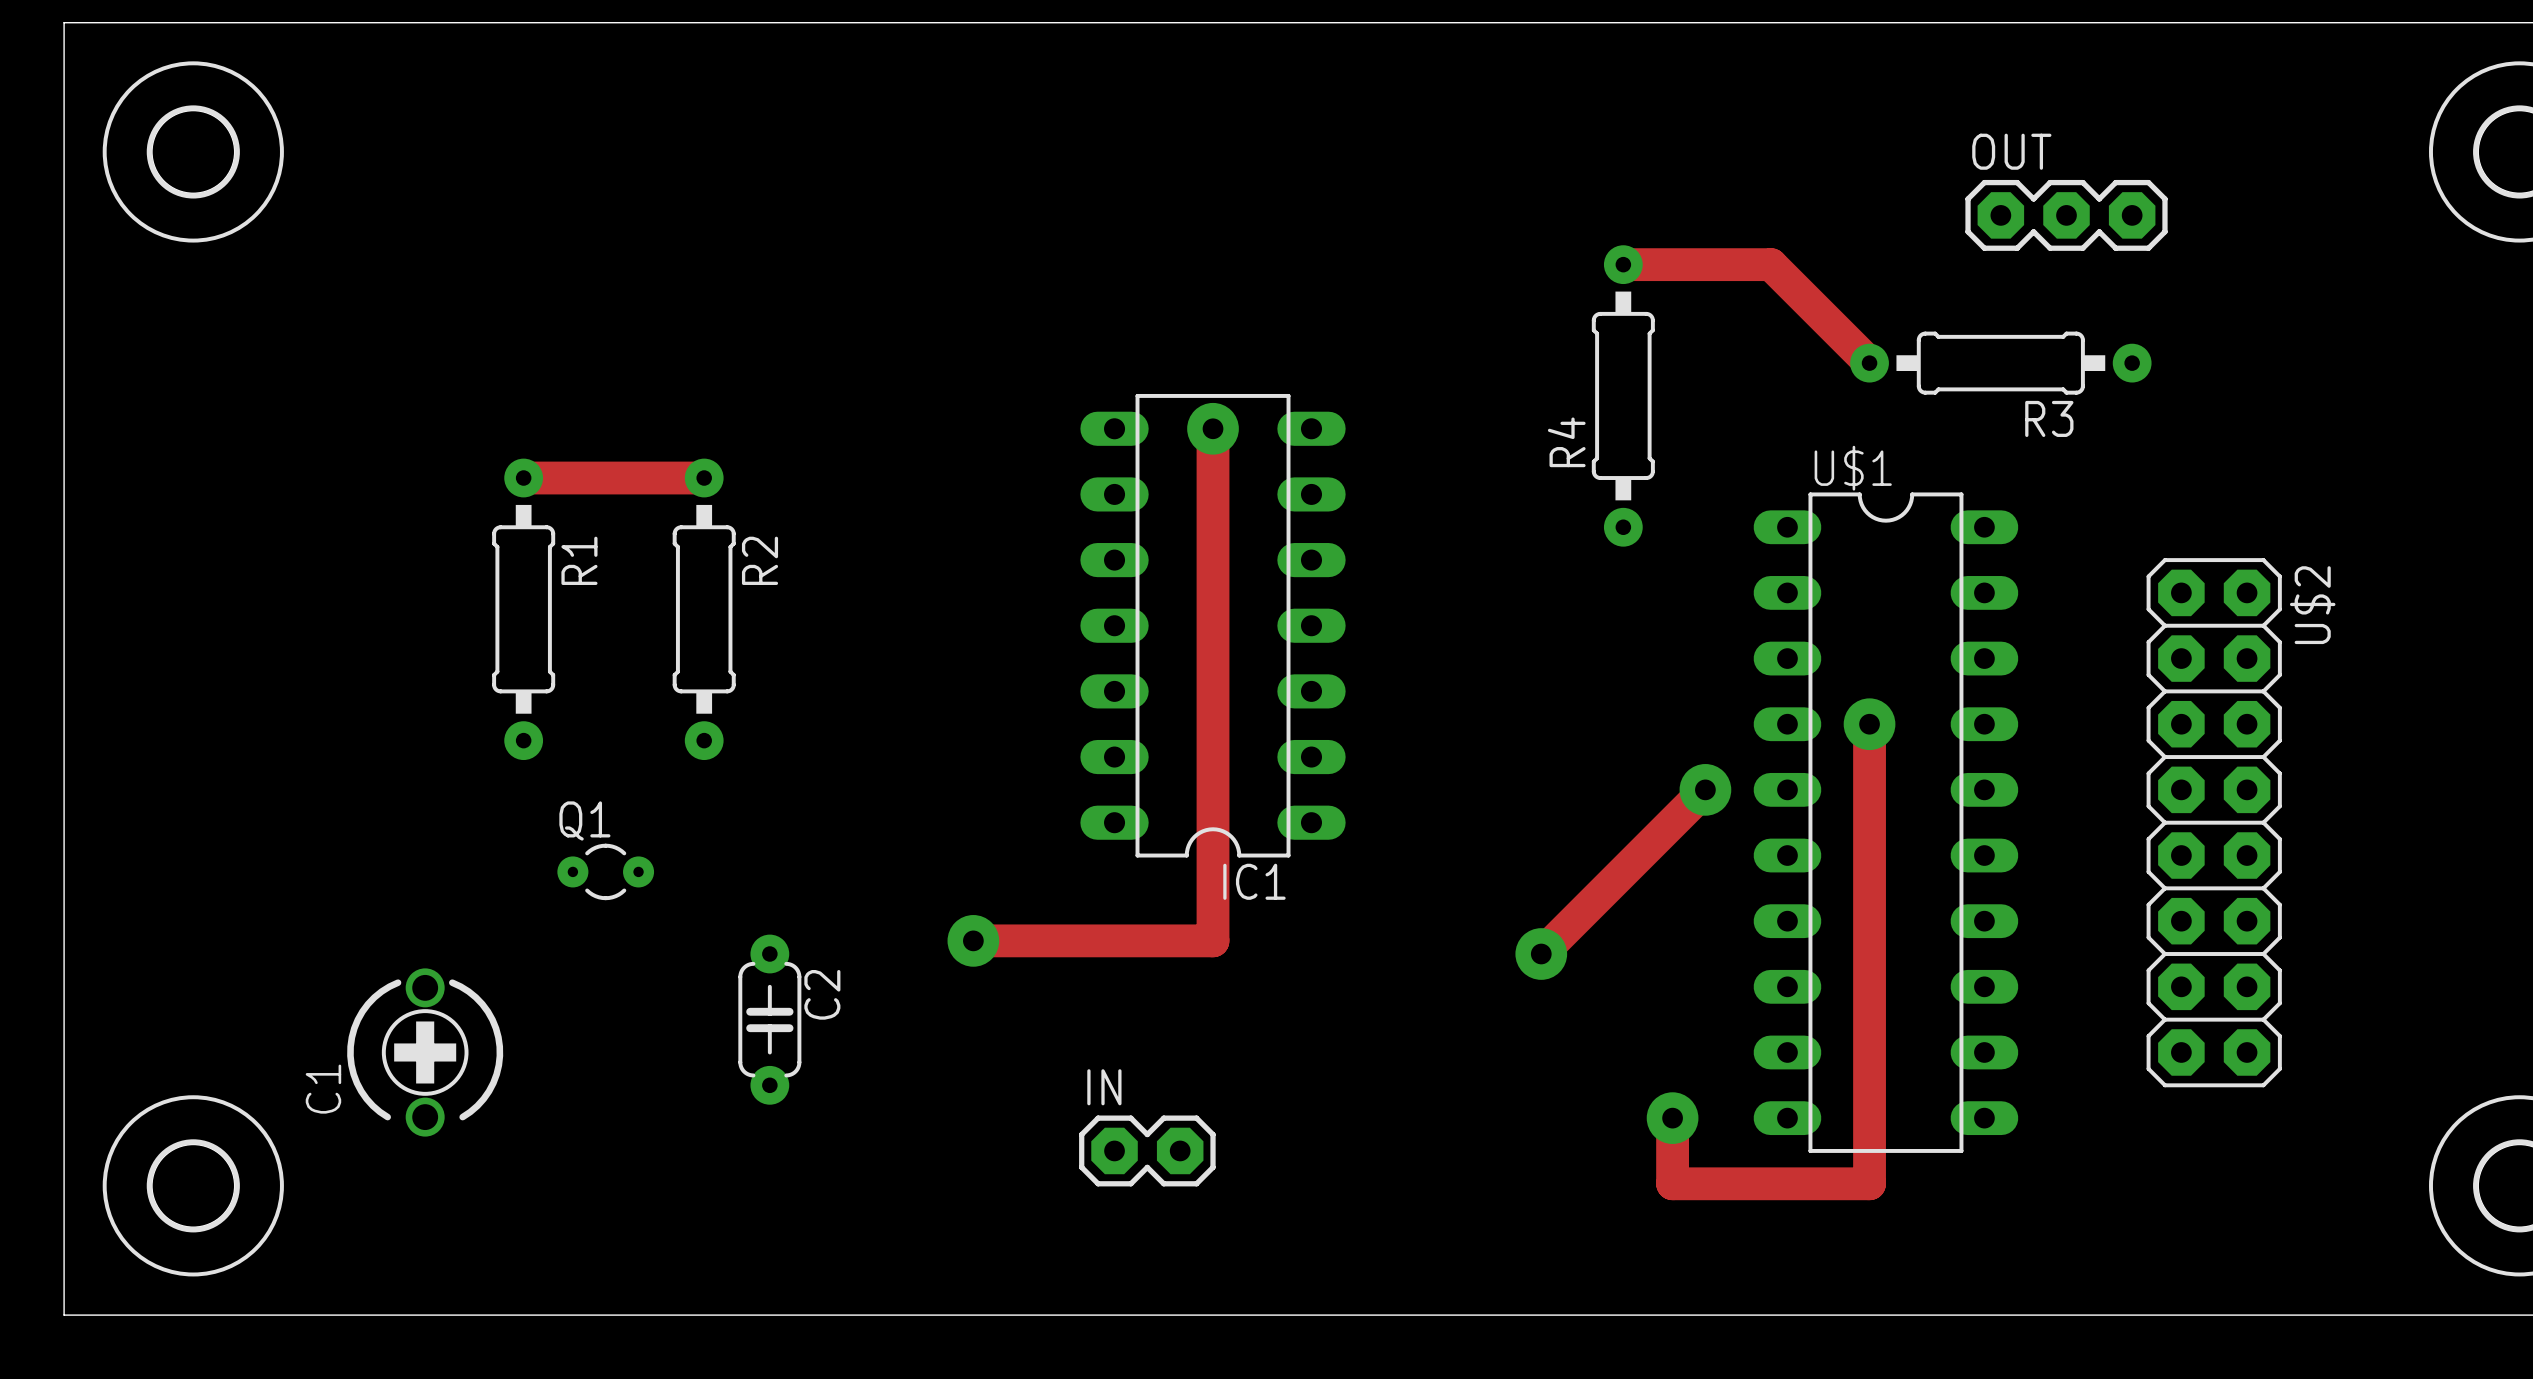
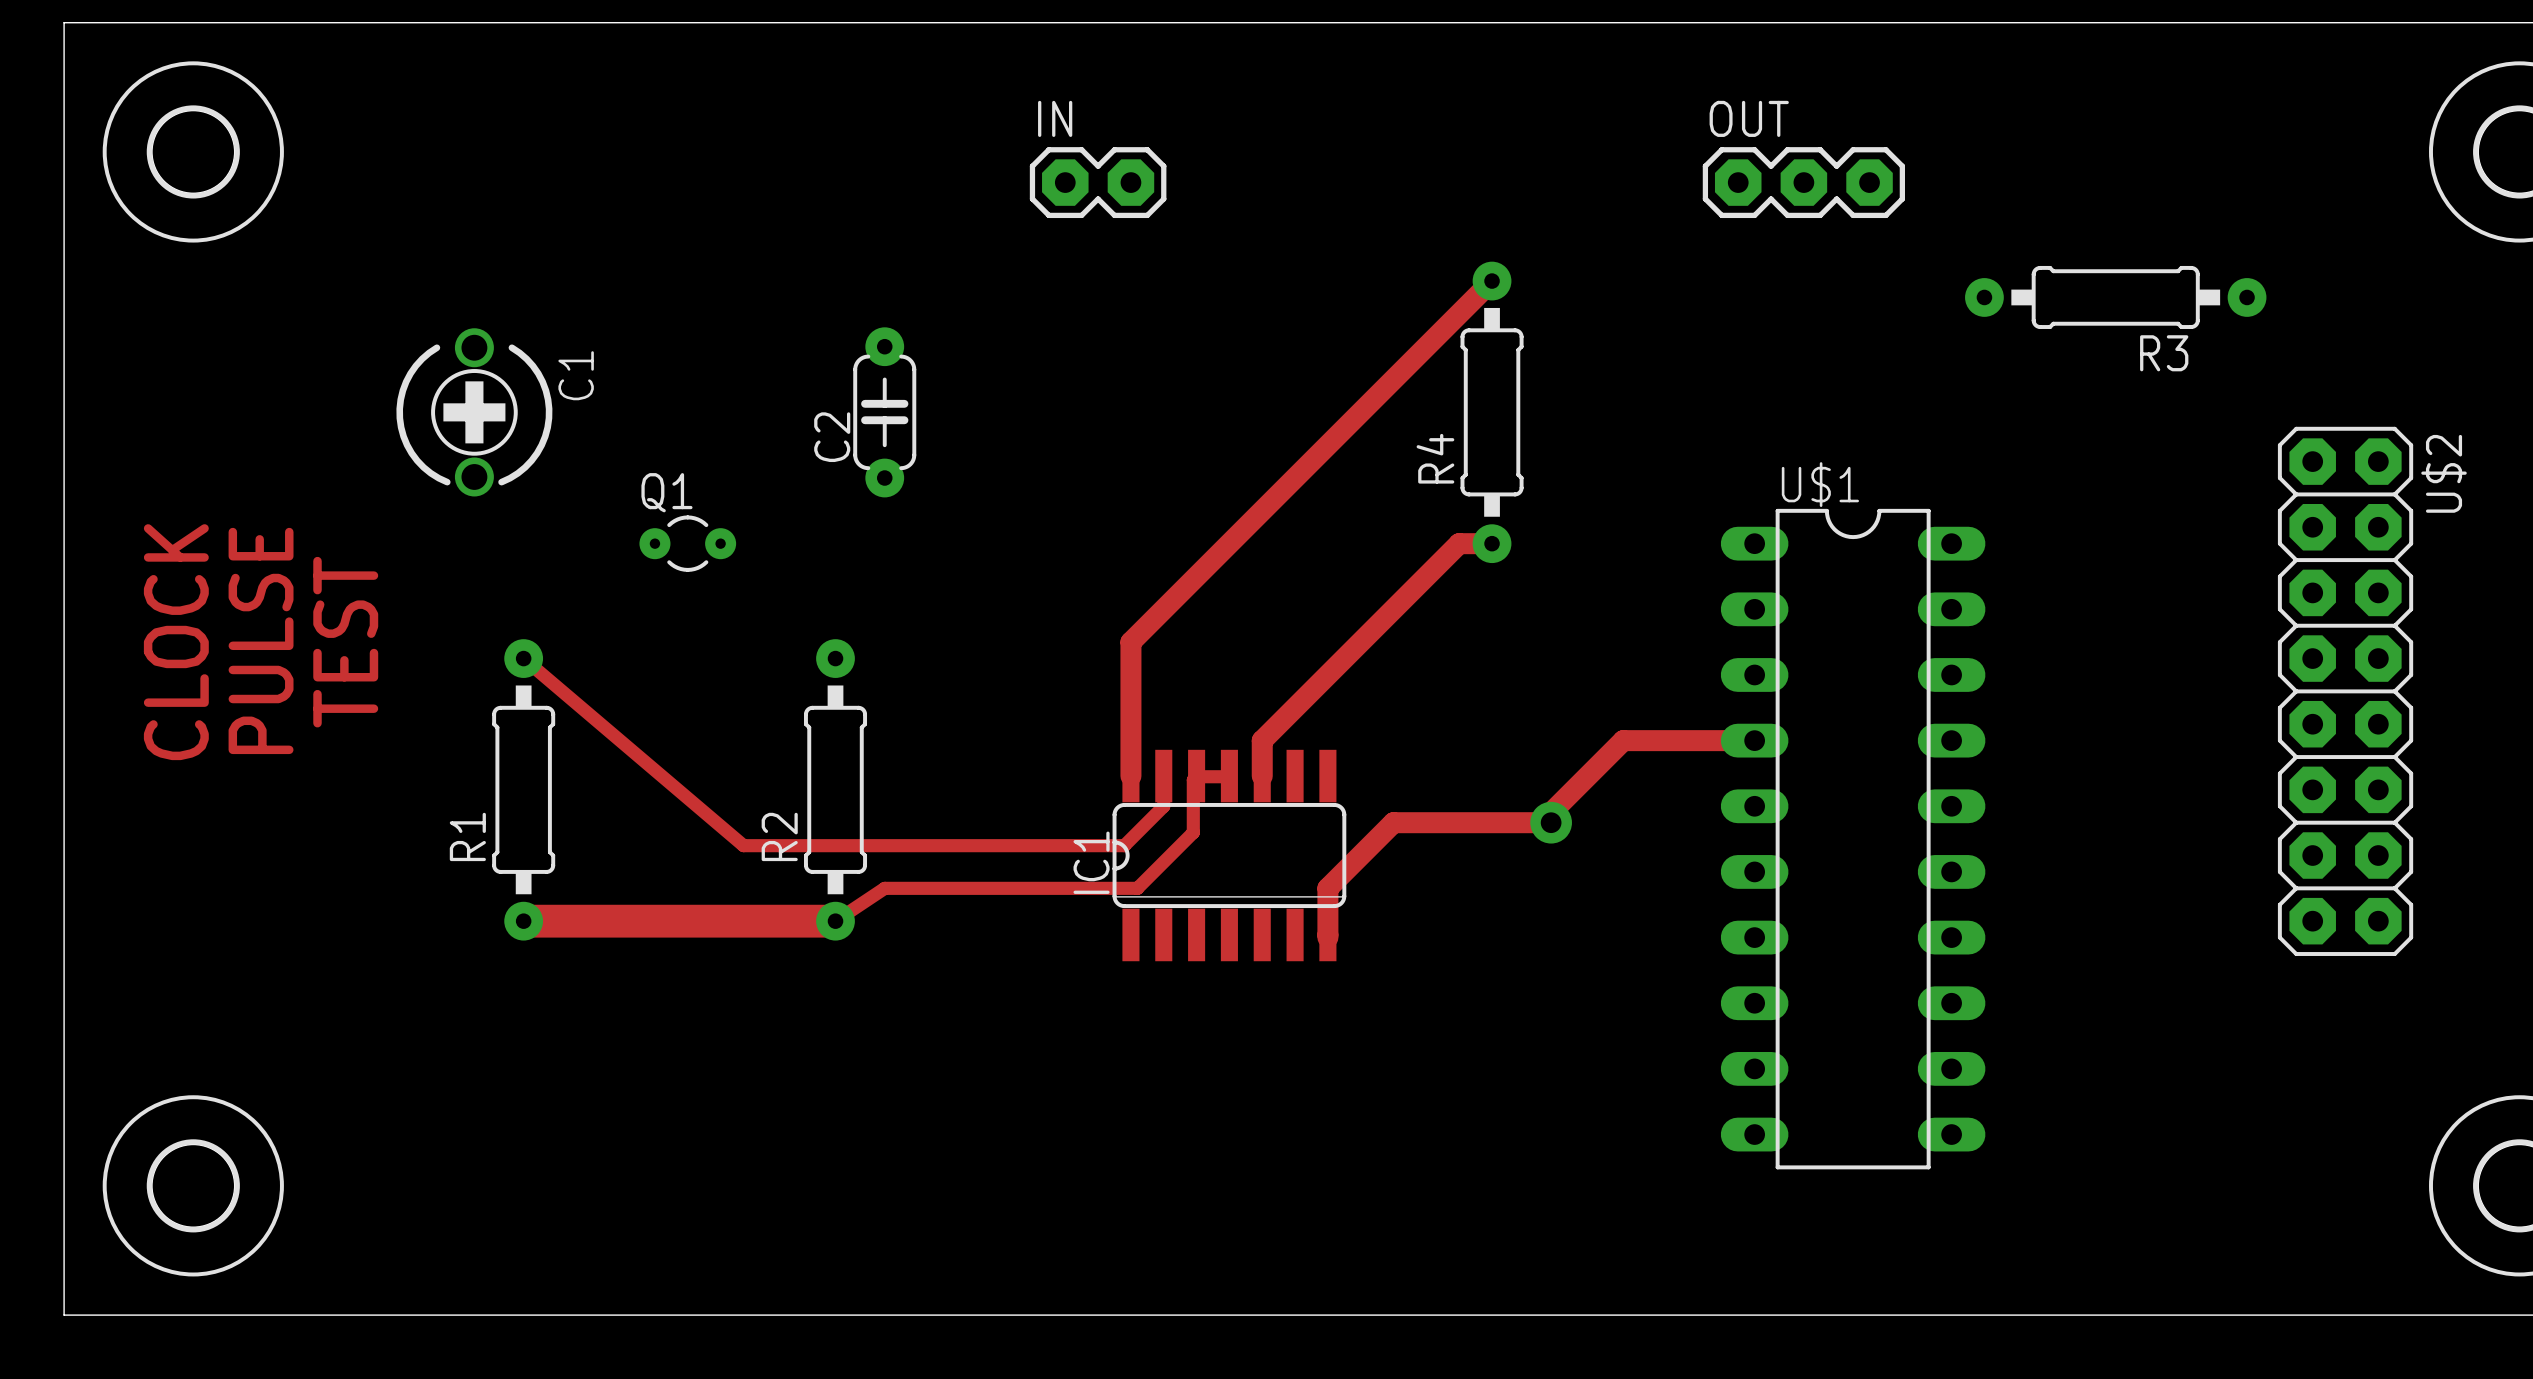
IN: none -> (1098, 182)
OUT position: (2066, 215) -> (1803, 182)
track: (1623, 264) (1771, 264) (1869, 363) -> none
track: none -> (1492, 281) (1130, 642) (1130, 776)
R3 position: (2000, 363) -> (2115, 297)
IC1 footprint: [1080, 393, 1346, 858] -> [1112, 749, 1347, 962]
R4 position: (1623, 395) -> (1492, 412)
track: (1213, 428) (1213, 940) (973, 940) -> none
via: (1213, 428) -> none
track: (523, 478) (704, 478) -> none
track: none -> (1492, 543) (1459, 543) (1262, 740) (1262, 776)
R1 name position: R1 (579, 560) -> R1 (467, 836)
R2 name position: R2 (760, 560) -> R2 (779, 836)
R1 position: (523, 609) -> (523, 789)
R2 position: (704, 609) -> (835, 789)
text: none -> PULSE (261, 640)
text: none -> CLOCK (176, 642)
text: none -> TEST (345, 642)
track: none -> (523, 658) (743, 845) (1124, 845) (1163, 806) (1163, 776)
track: (1869, 724) (1869, 1183) (1672, 1183) (1672, 1118) -> none
via: (1869, 724) -> none
track: none -> (1754, 740) (1623, 740) (1551, 812) (1551, 822) (1393, 822) (1327, 888) (1327, 937)
track: none -> (1229, 776) (1196, 776) (1193, 780) (1193, 832) (1137, 888) (884, 888) (835, 921) (523, 921)
track: (1705, 789) (1541, 954) -> none
via: (1705, 789) -> none
via: none -> (1551, 822)
U$1 position: (1885, 822) -> (1853, 839)
U$2 position: (2214, 822) -> (2345, 691)
Q1 position: (605, 871) -> (687, 543)
IC1 name position: IC1 (1254, 881) -> IC1 (1091, 862)
via: (973, 940) -> none
via: (1541, 954) -> none
C2 rotation: 0° (769, 1019) -> 180° (884, 412)
C2 position: (769, 1019) -> (884, 412)
C1 rotation: 0° (425, 1052) -> 180° (474, 412)
C1 position: (425, 1052) -> (474, 412)
via: (1672, 1118) -> none
IN: (1147, 1150) -> none

